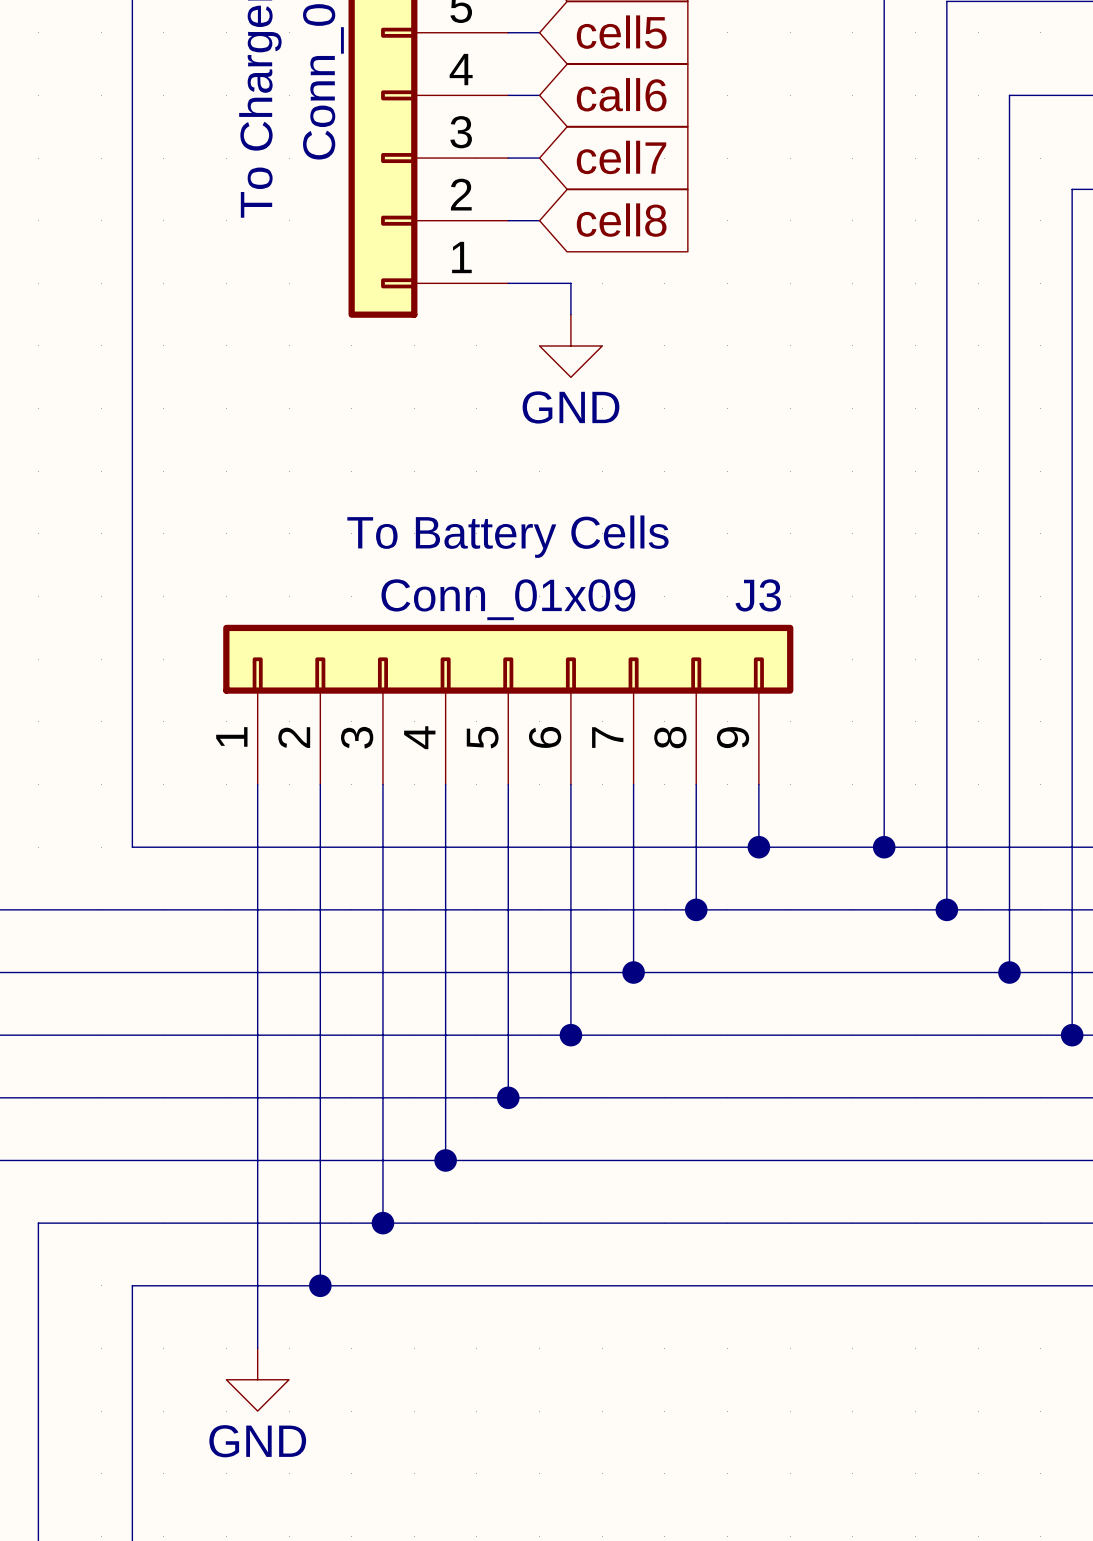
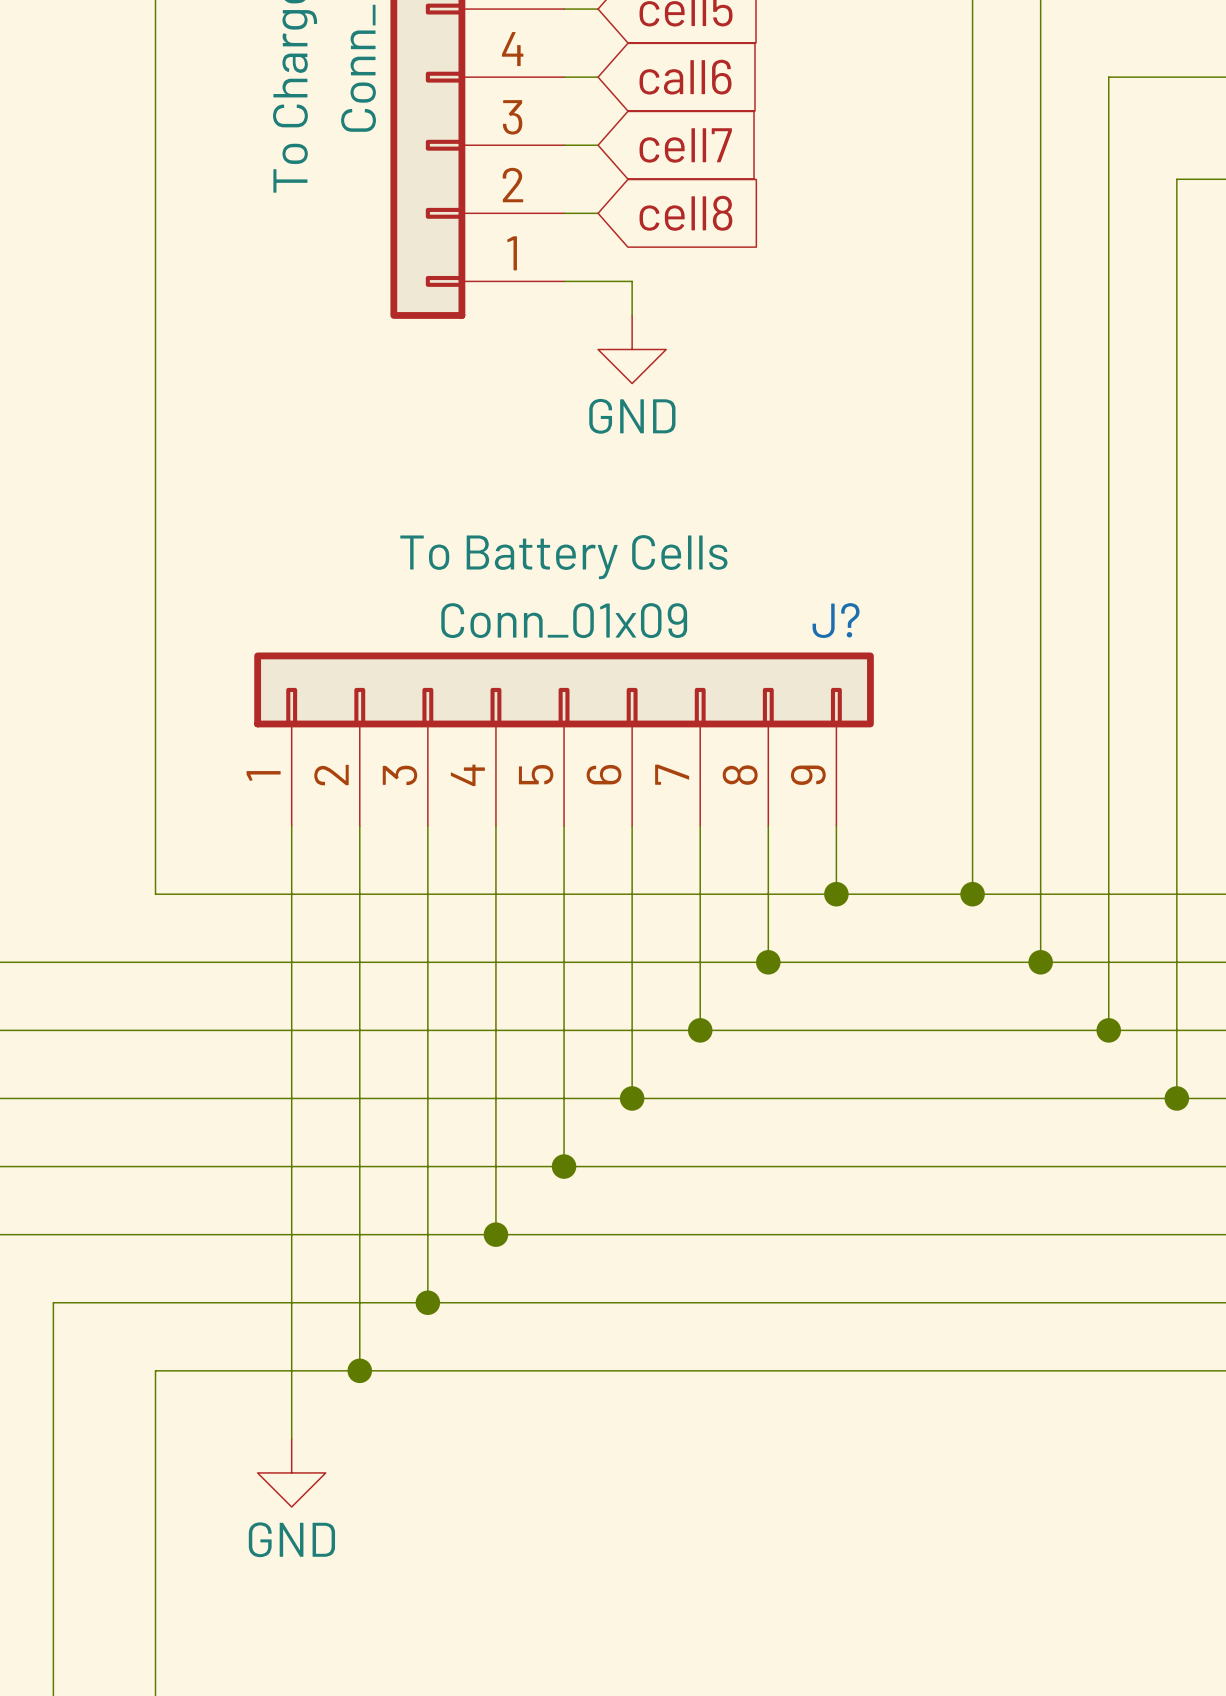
J3 name: J3 (758, 595) -> J? (836, 620)

